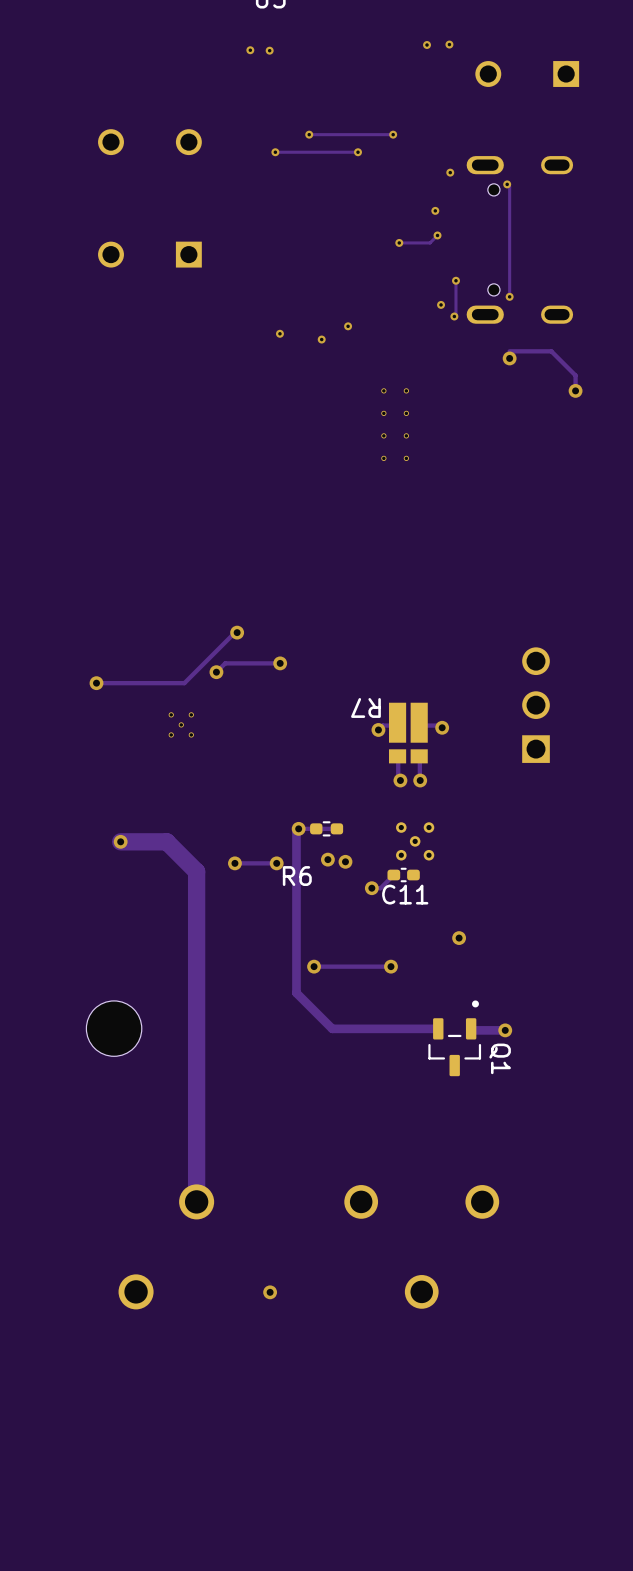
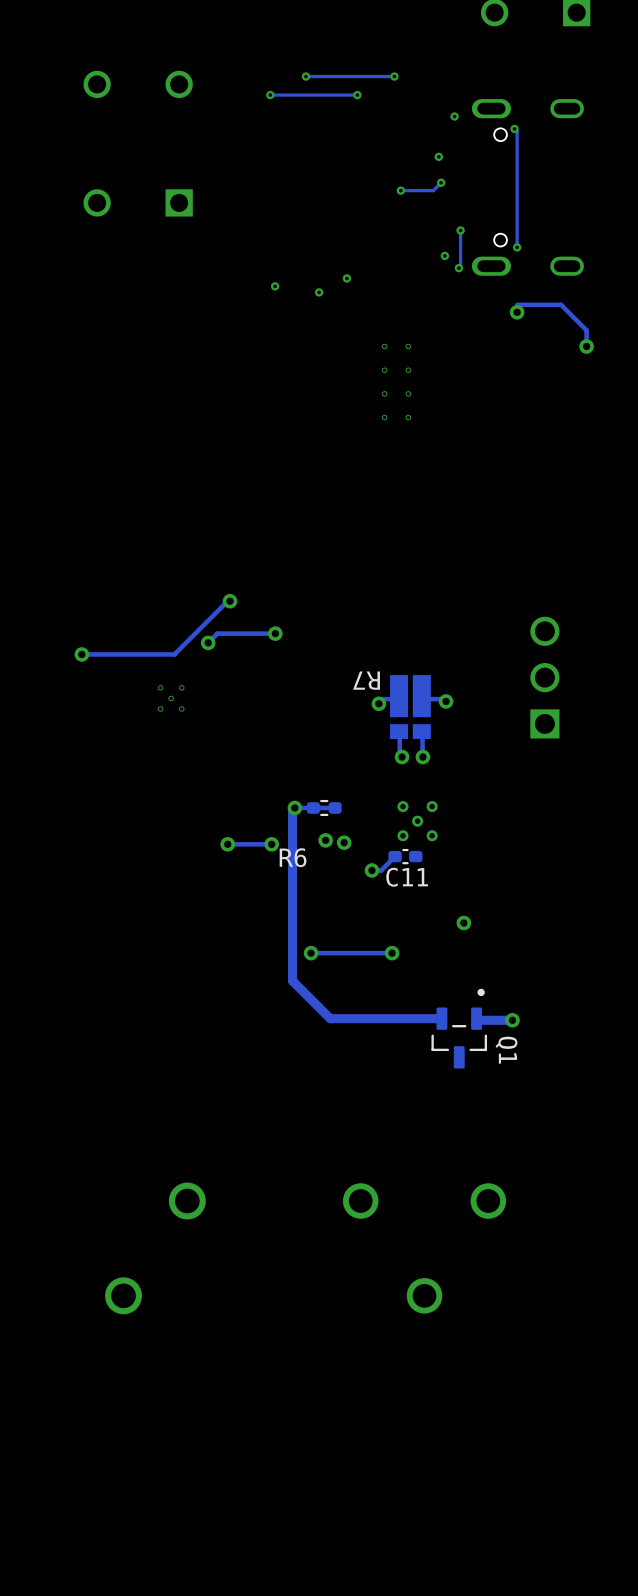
track: (120, 841) (166, 841) (196, 871) (196, 1201) -> none
via: (120, 841) -> none
part: (114, 1028) -> none
via: (270, 1292) -> none

